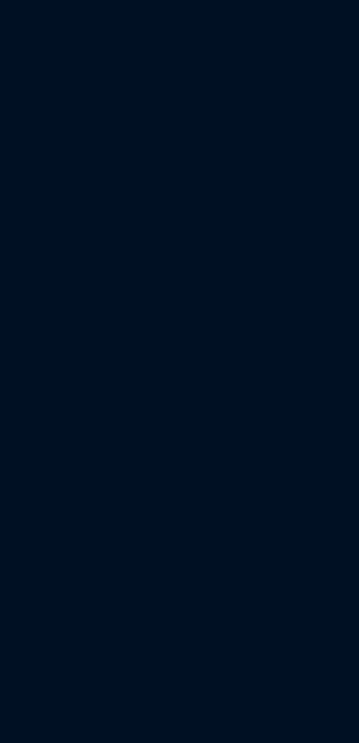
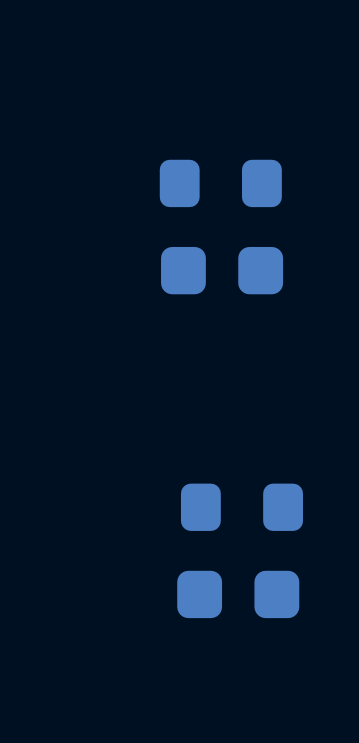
part: none -> (220, 183)
part: none -> (222, 270)
part: none -> (241, 507)
part: none -> (238, 594)

